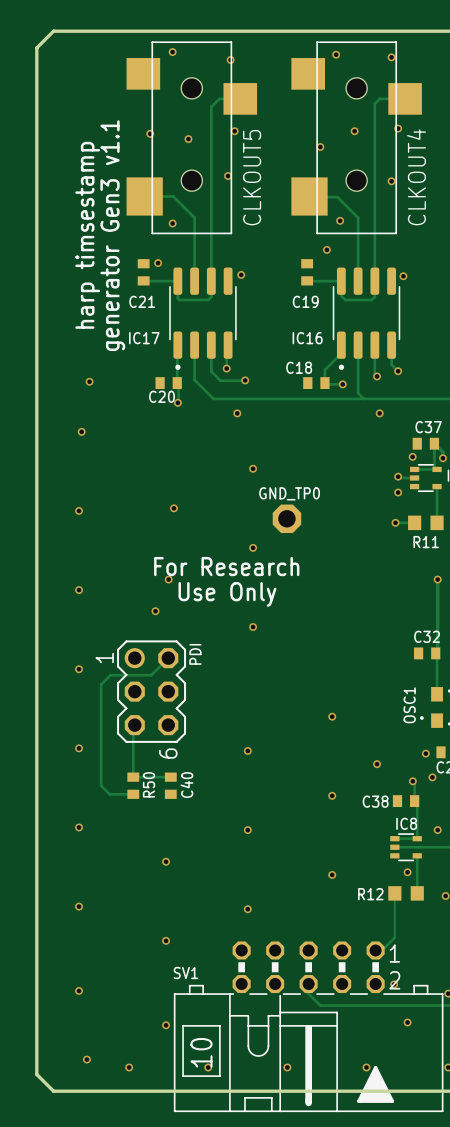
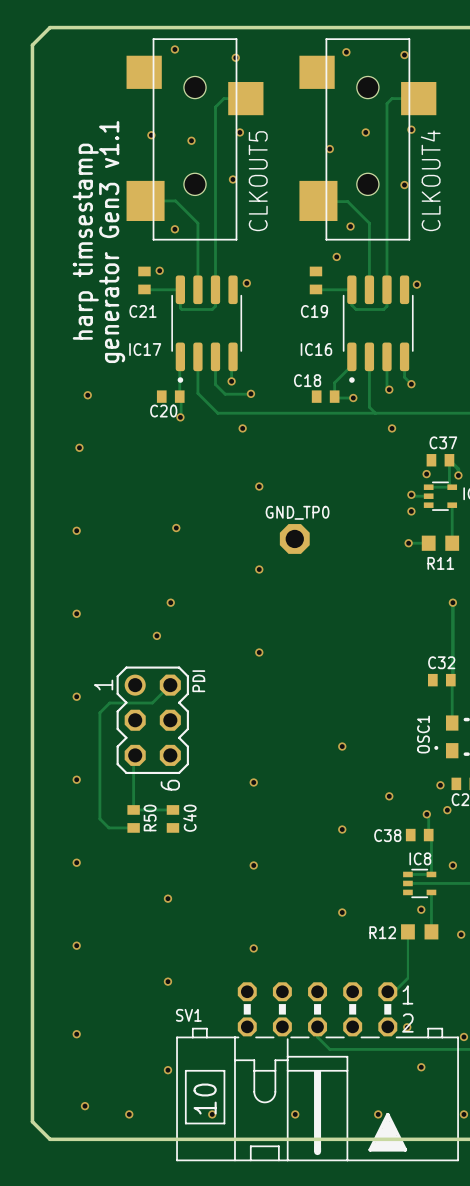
text: For Research (226, 566) -> none
text: Use Only (227, 594) -> none

